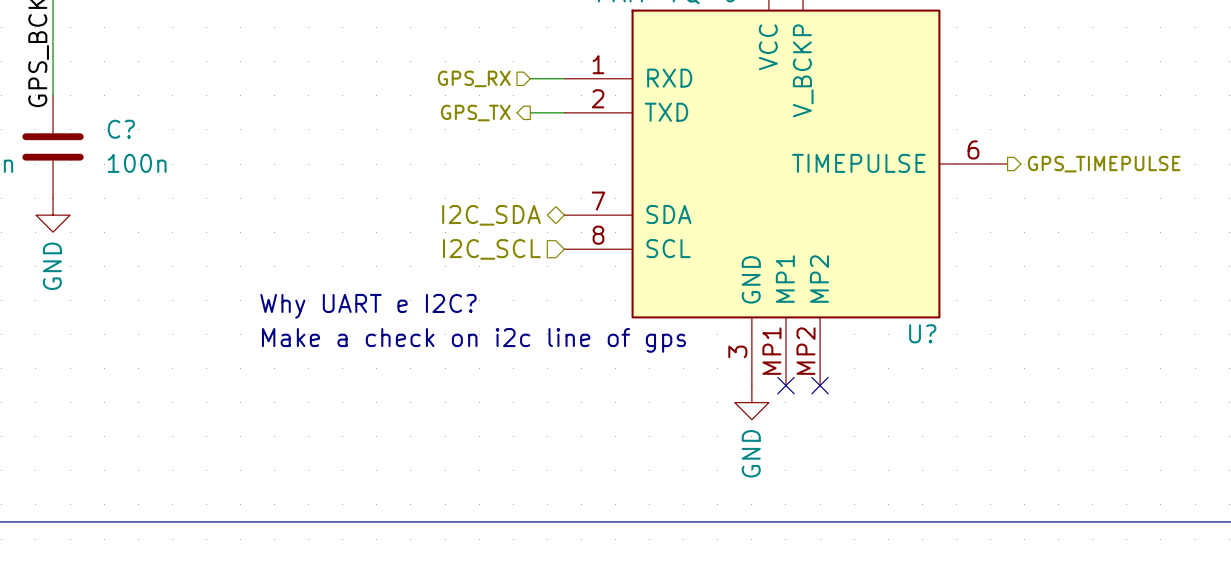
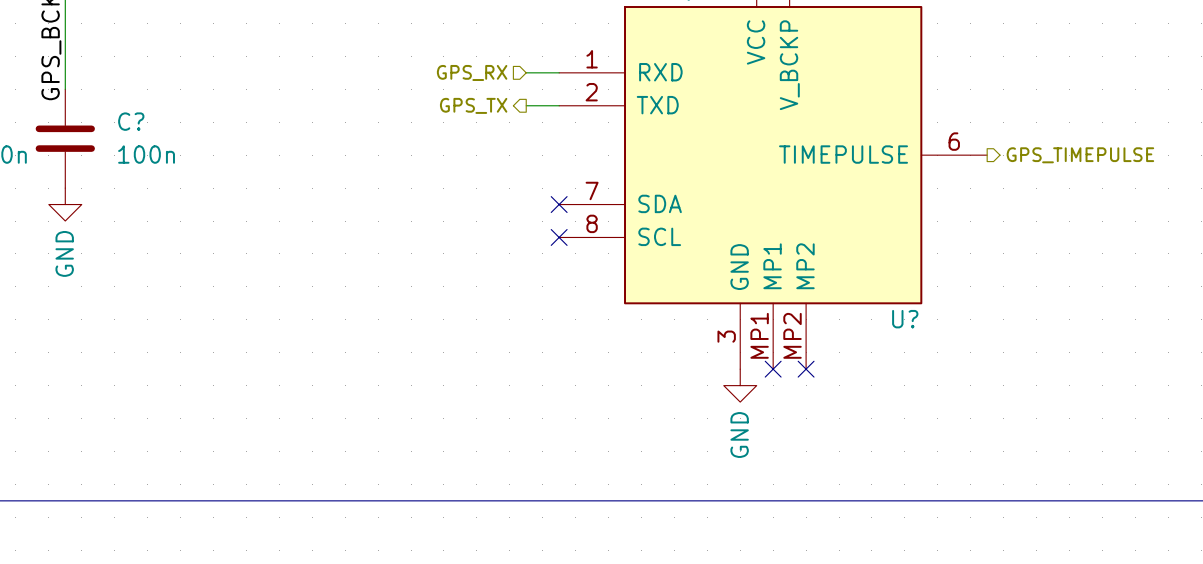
hierarchical label: I2C_SDA (491, 215) -> none
no-connect mark: none -> (559, 204)
hierarchical label: I2C_SCL (491, 249) -> none
no-connect mark: none -> (559, 237)
text: Why UART e I2C? (368, 306) -> none
text: Make a check on i2c line of gps (474, 340) -> none

